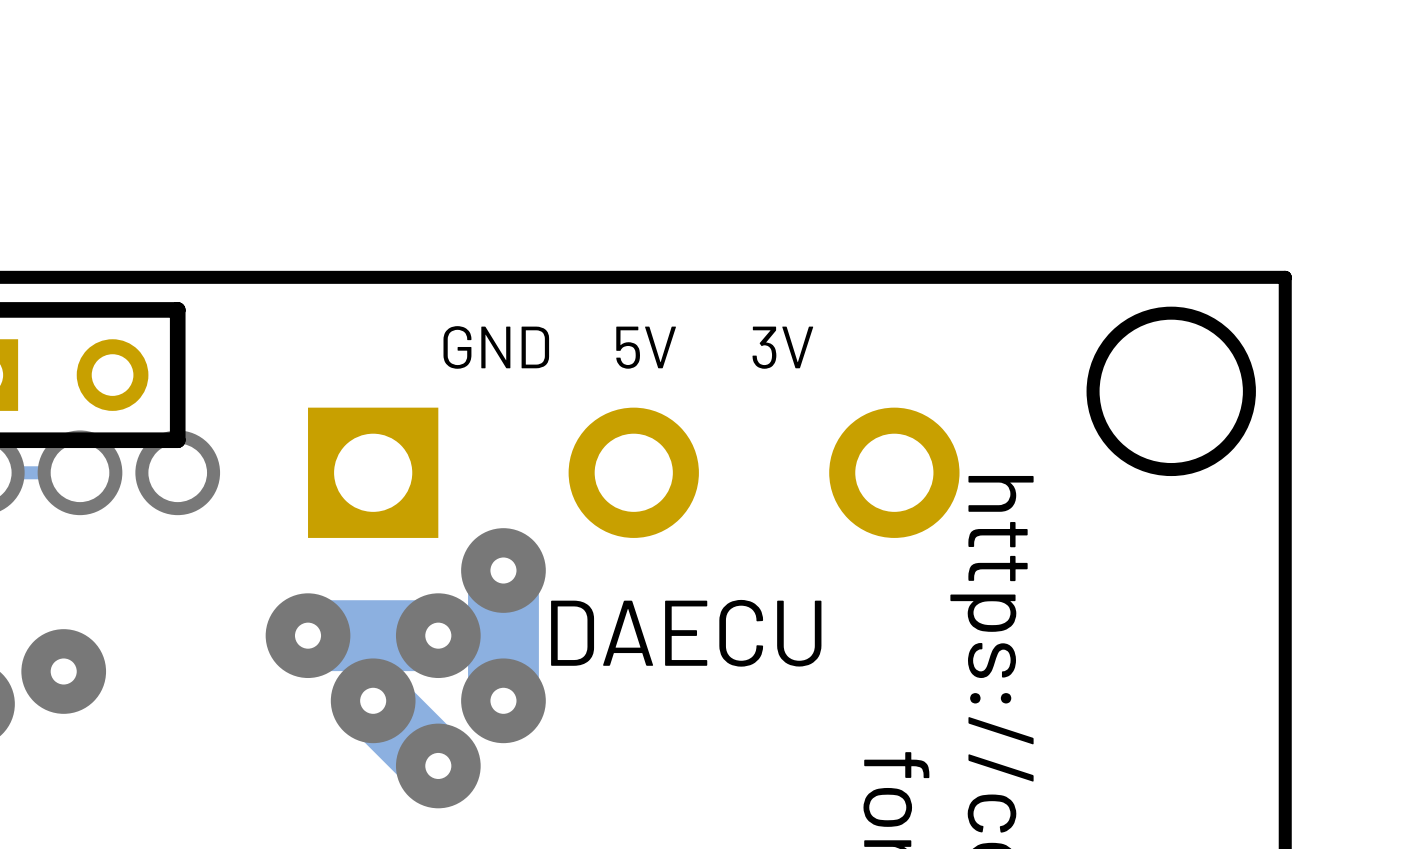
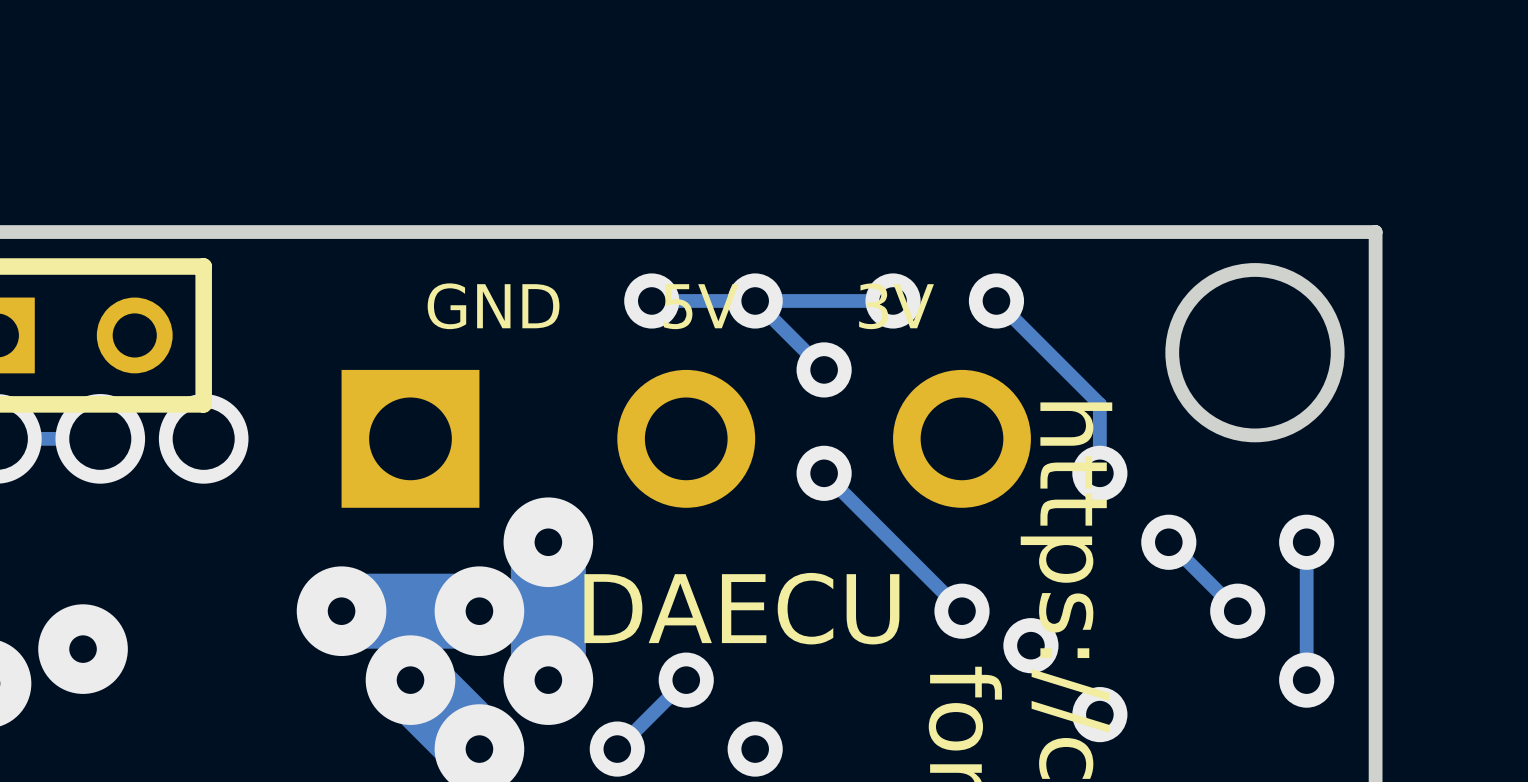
via: none -> (651, 300)
track: none -> (755, 300) (824, 369)
via: none -> (755, 300)
track: none -> (893, 300) (651, 300)
via: none -> (893, 300)
track: none -> (996, 300) (1099, 404) (1099, 473)
via: none -> (996, 300)
via: none -> (824, 369)
track: none -> (824, 473) (961, 611)
via: none -> (824, 473)
via: none -> (1099, 473)
track: none -> (1168, 542) (1237, 611)
via: none -> (1168, 542)
track: none -> (1306, 542) (1306, 680)
via: none -> (1306, 542)
via: none -> (961, 611)
via: none -> (1237, 611)
via: none -> (1030, 645)
track: none -> (686, 680) (617, 749)
via: none -> (686, 680)
via: none -> (1306, 680)
via: none -> (1099, 714)
via: none -> (617, 749)
via: none -> (755, 749)

